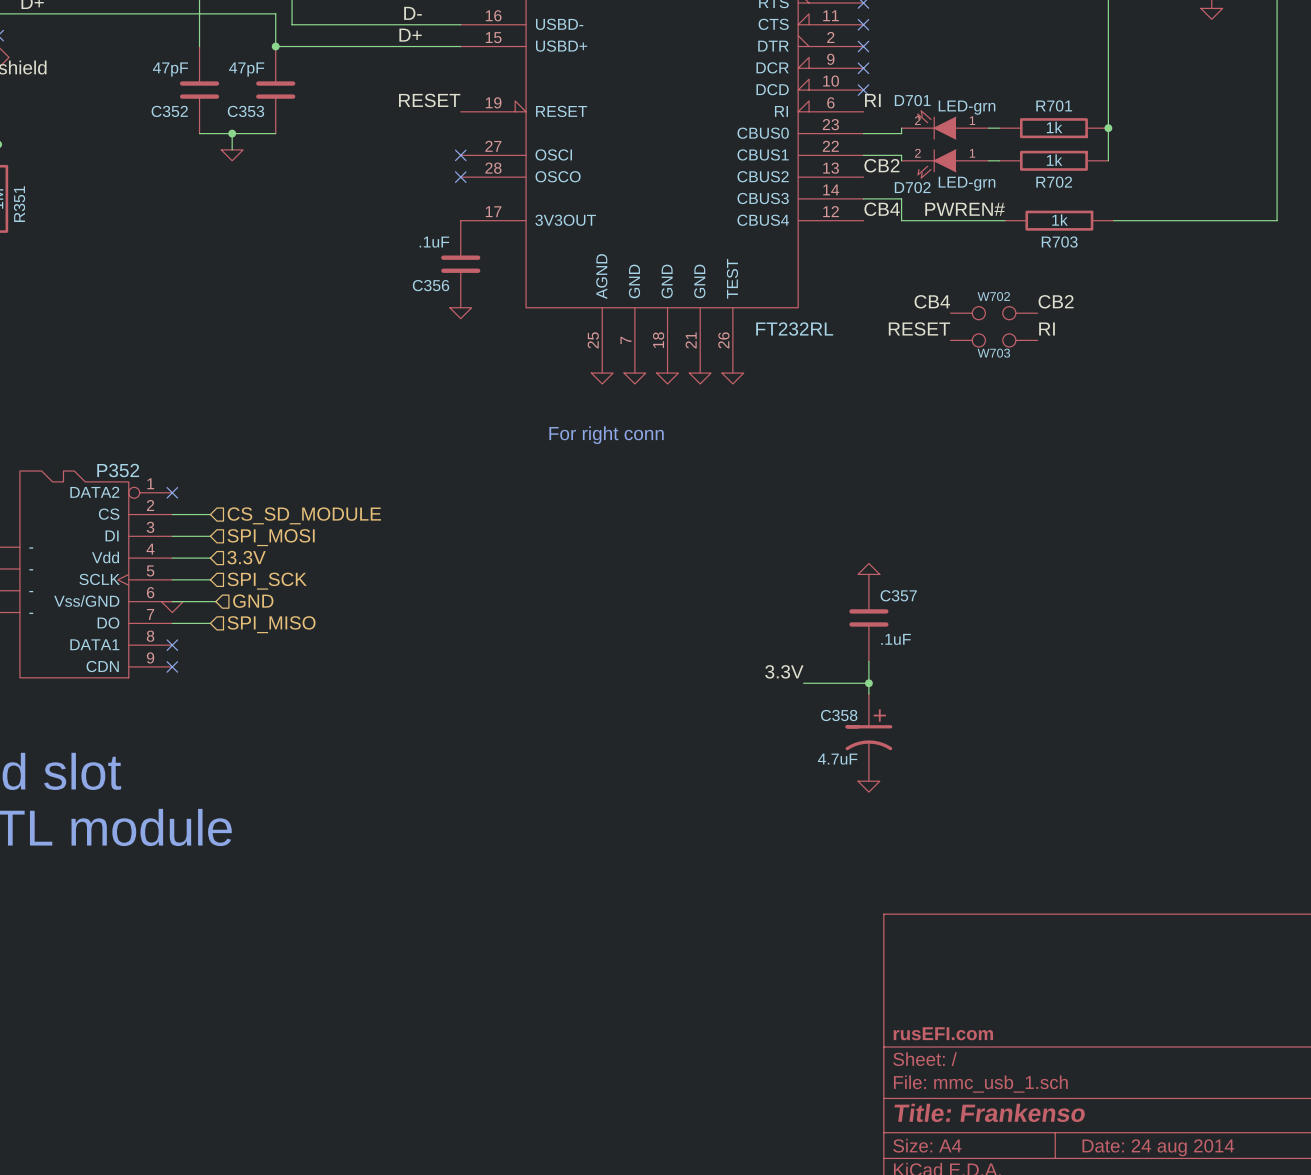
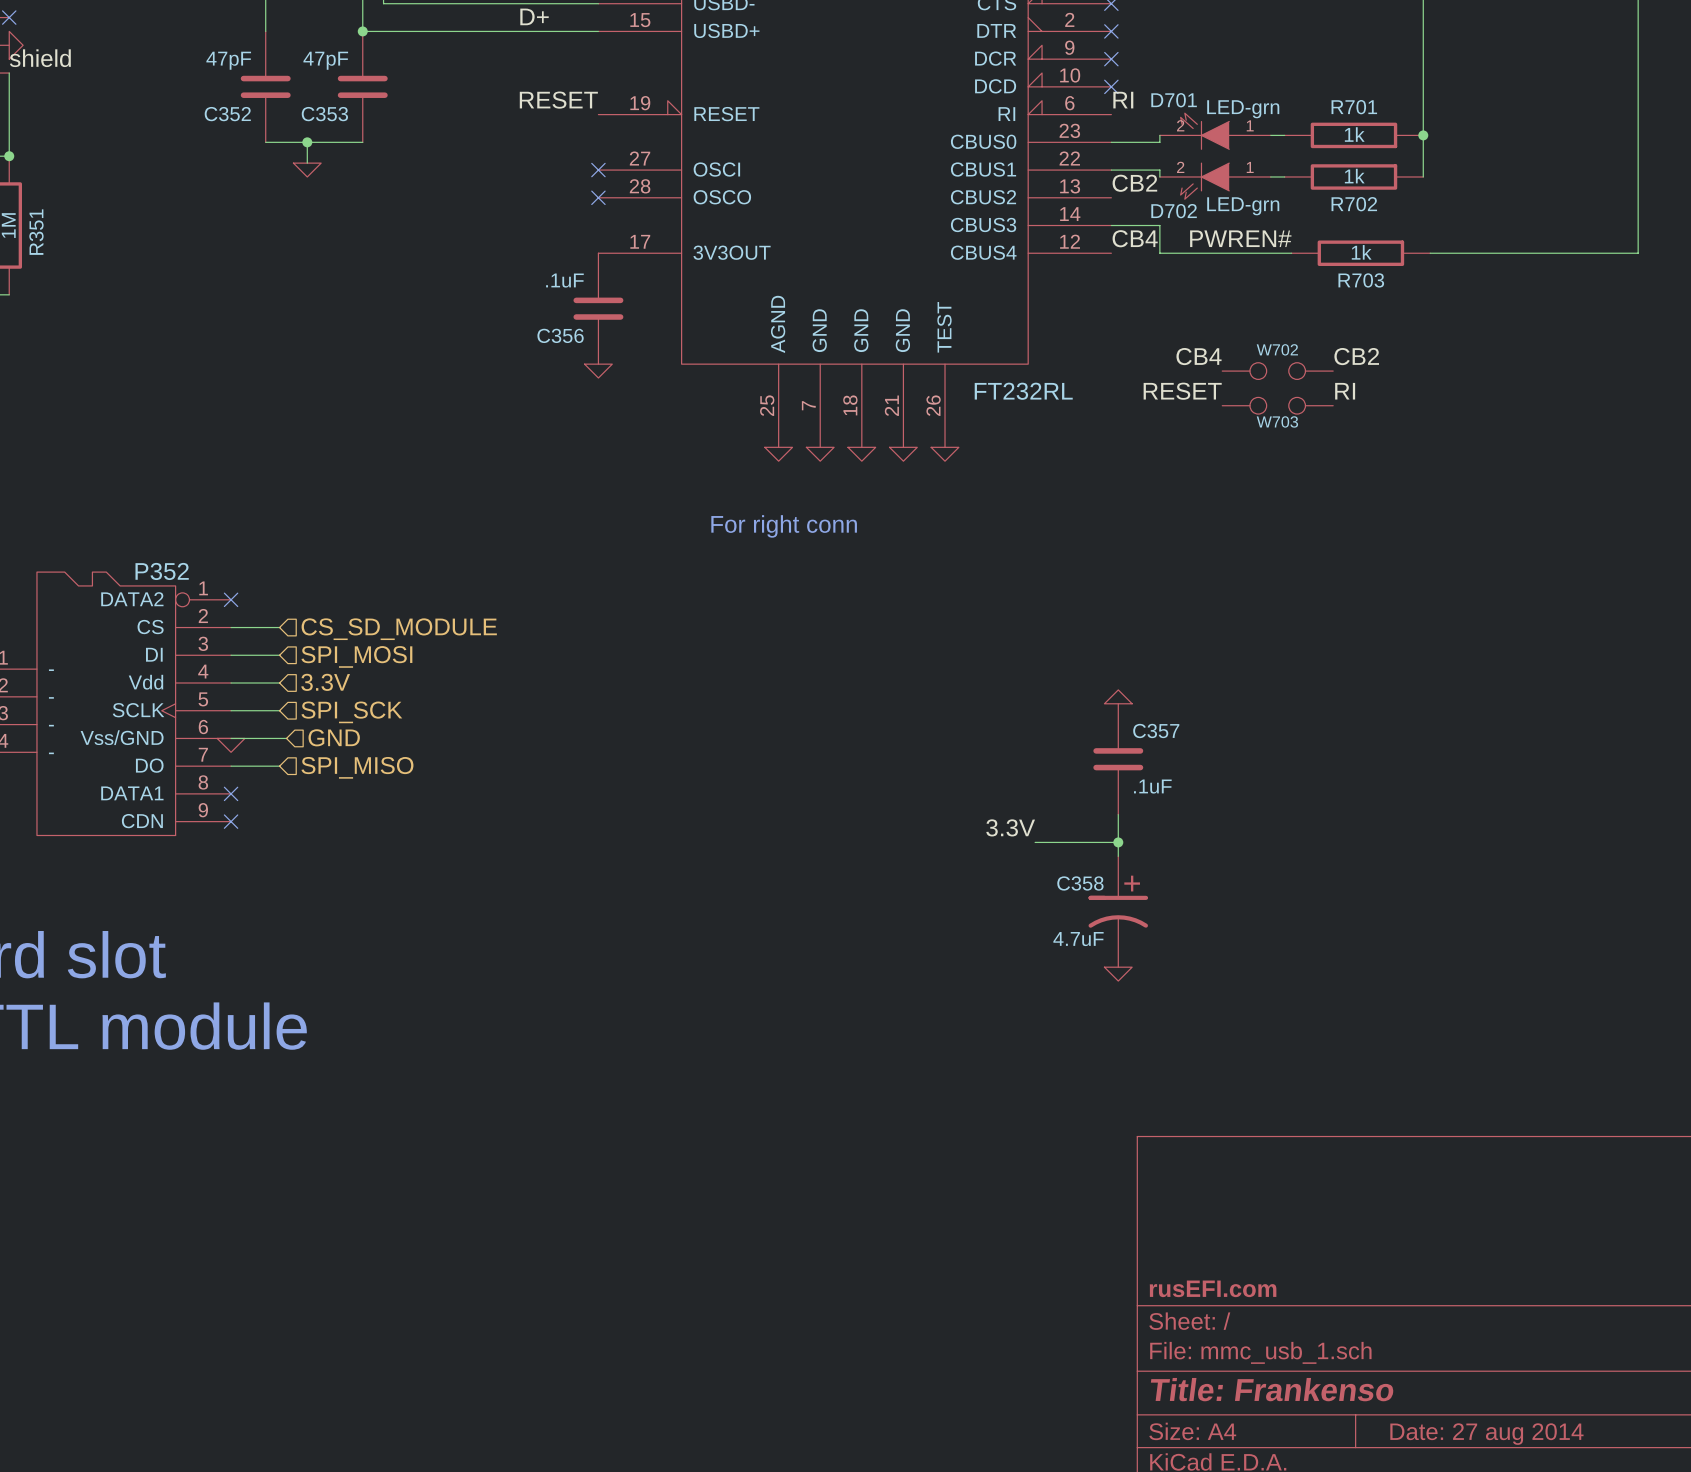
title block: Date: 24 aug 2014 (1158, 1147) -> Date: 27 aug 2014 (1486, 1434)

